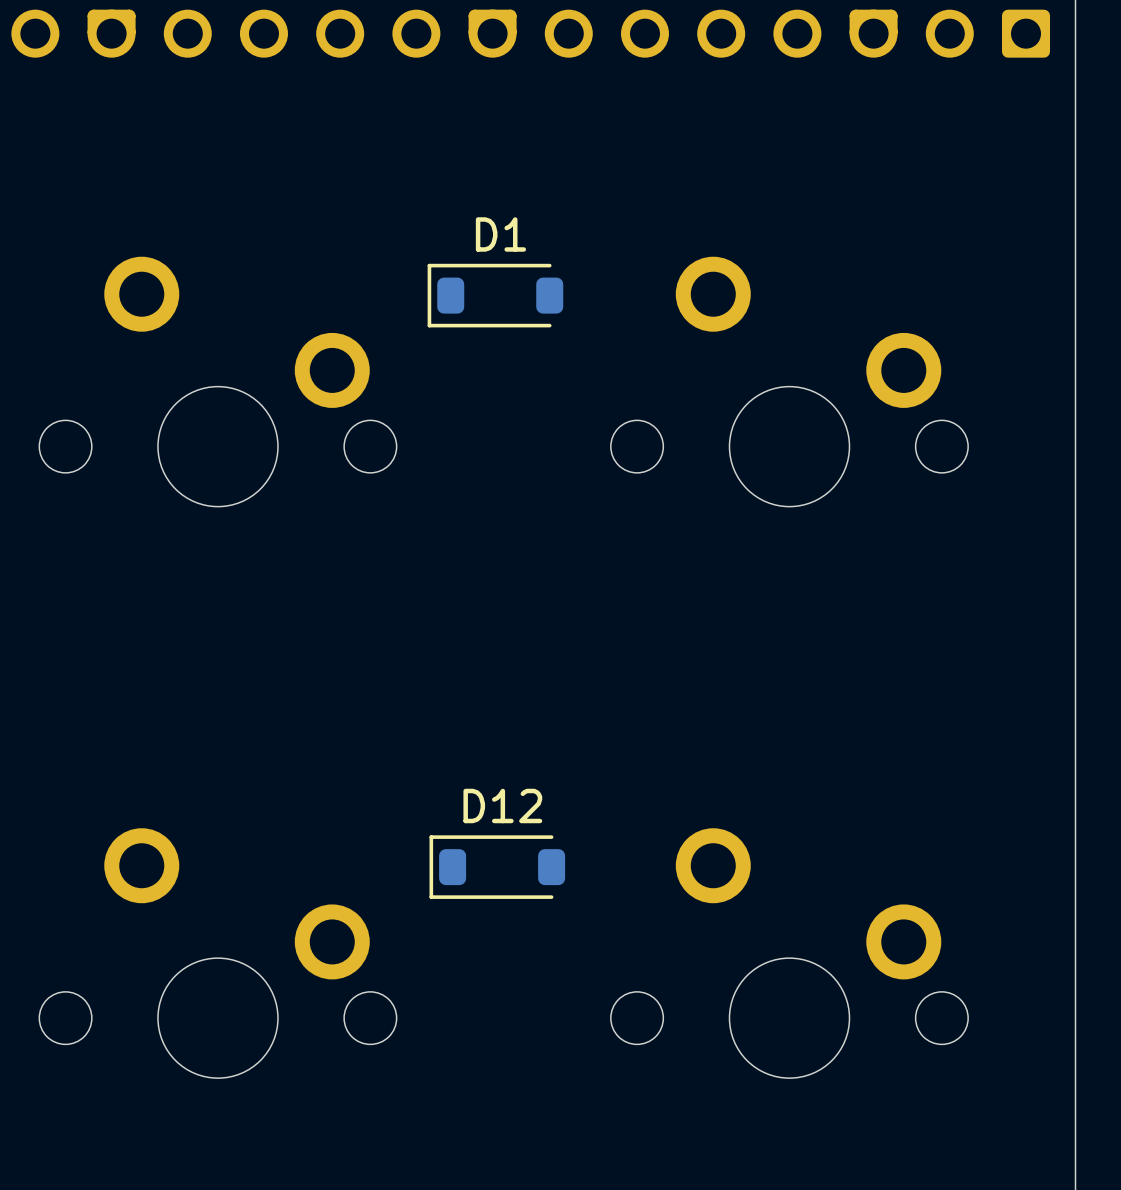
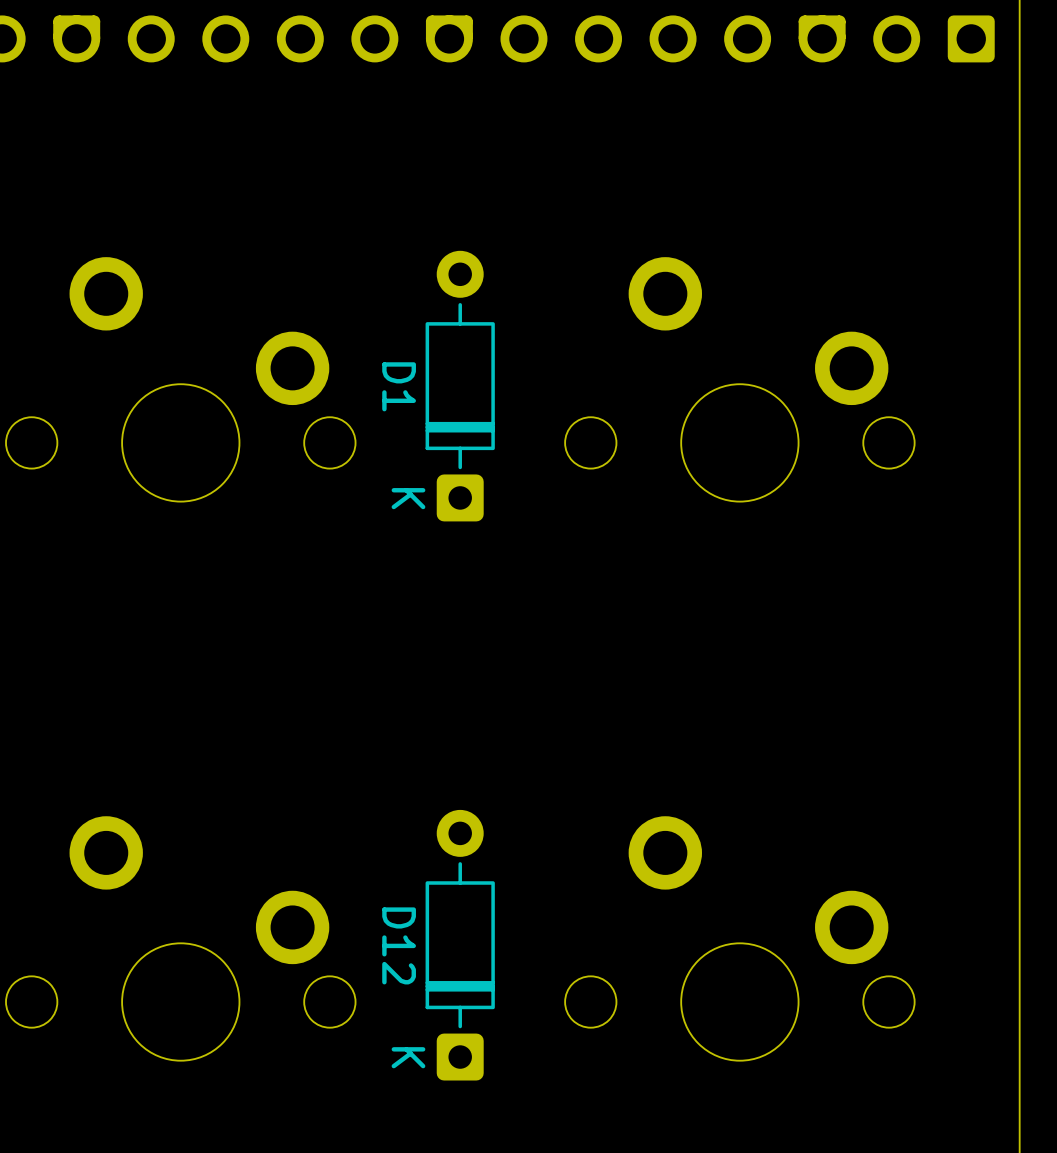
D1 name position: D1 (500, 234) -> D1 (399, 386)
D1 footprint: [427, 263, 564, 328] -> [425, 250, 495, 522]
D12 name position: D12 (502, 805) -> D12 (399, 945)
D12 footprint: [429, 835, 566, 899] -> [425, 809, 495, 1081]

